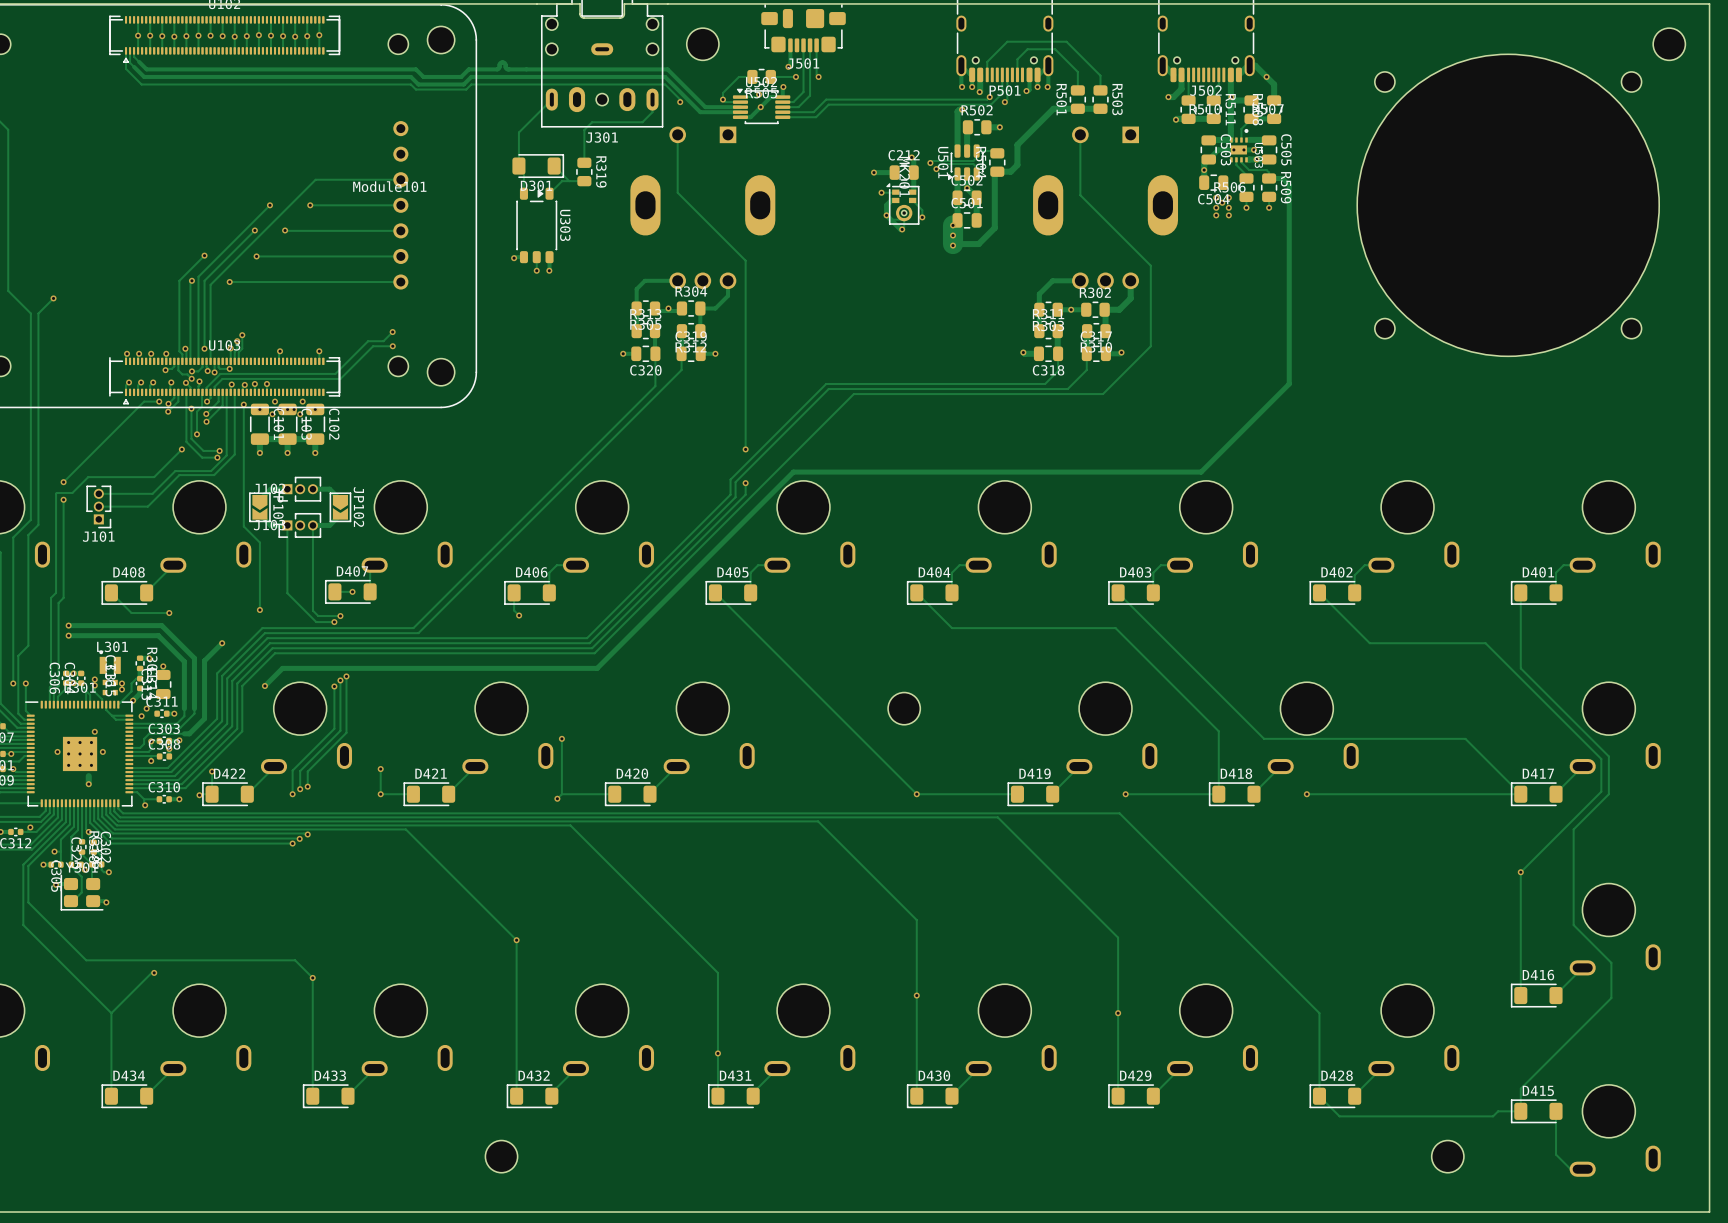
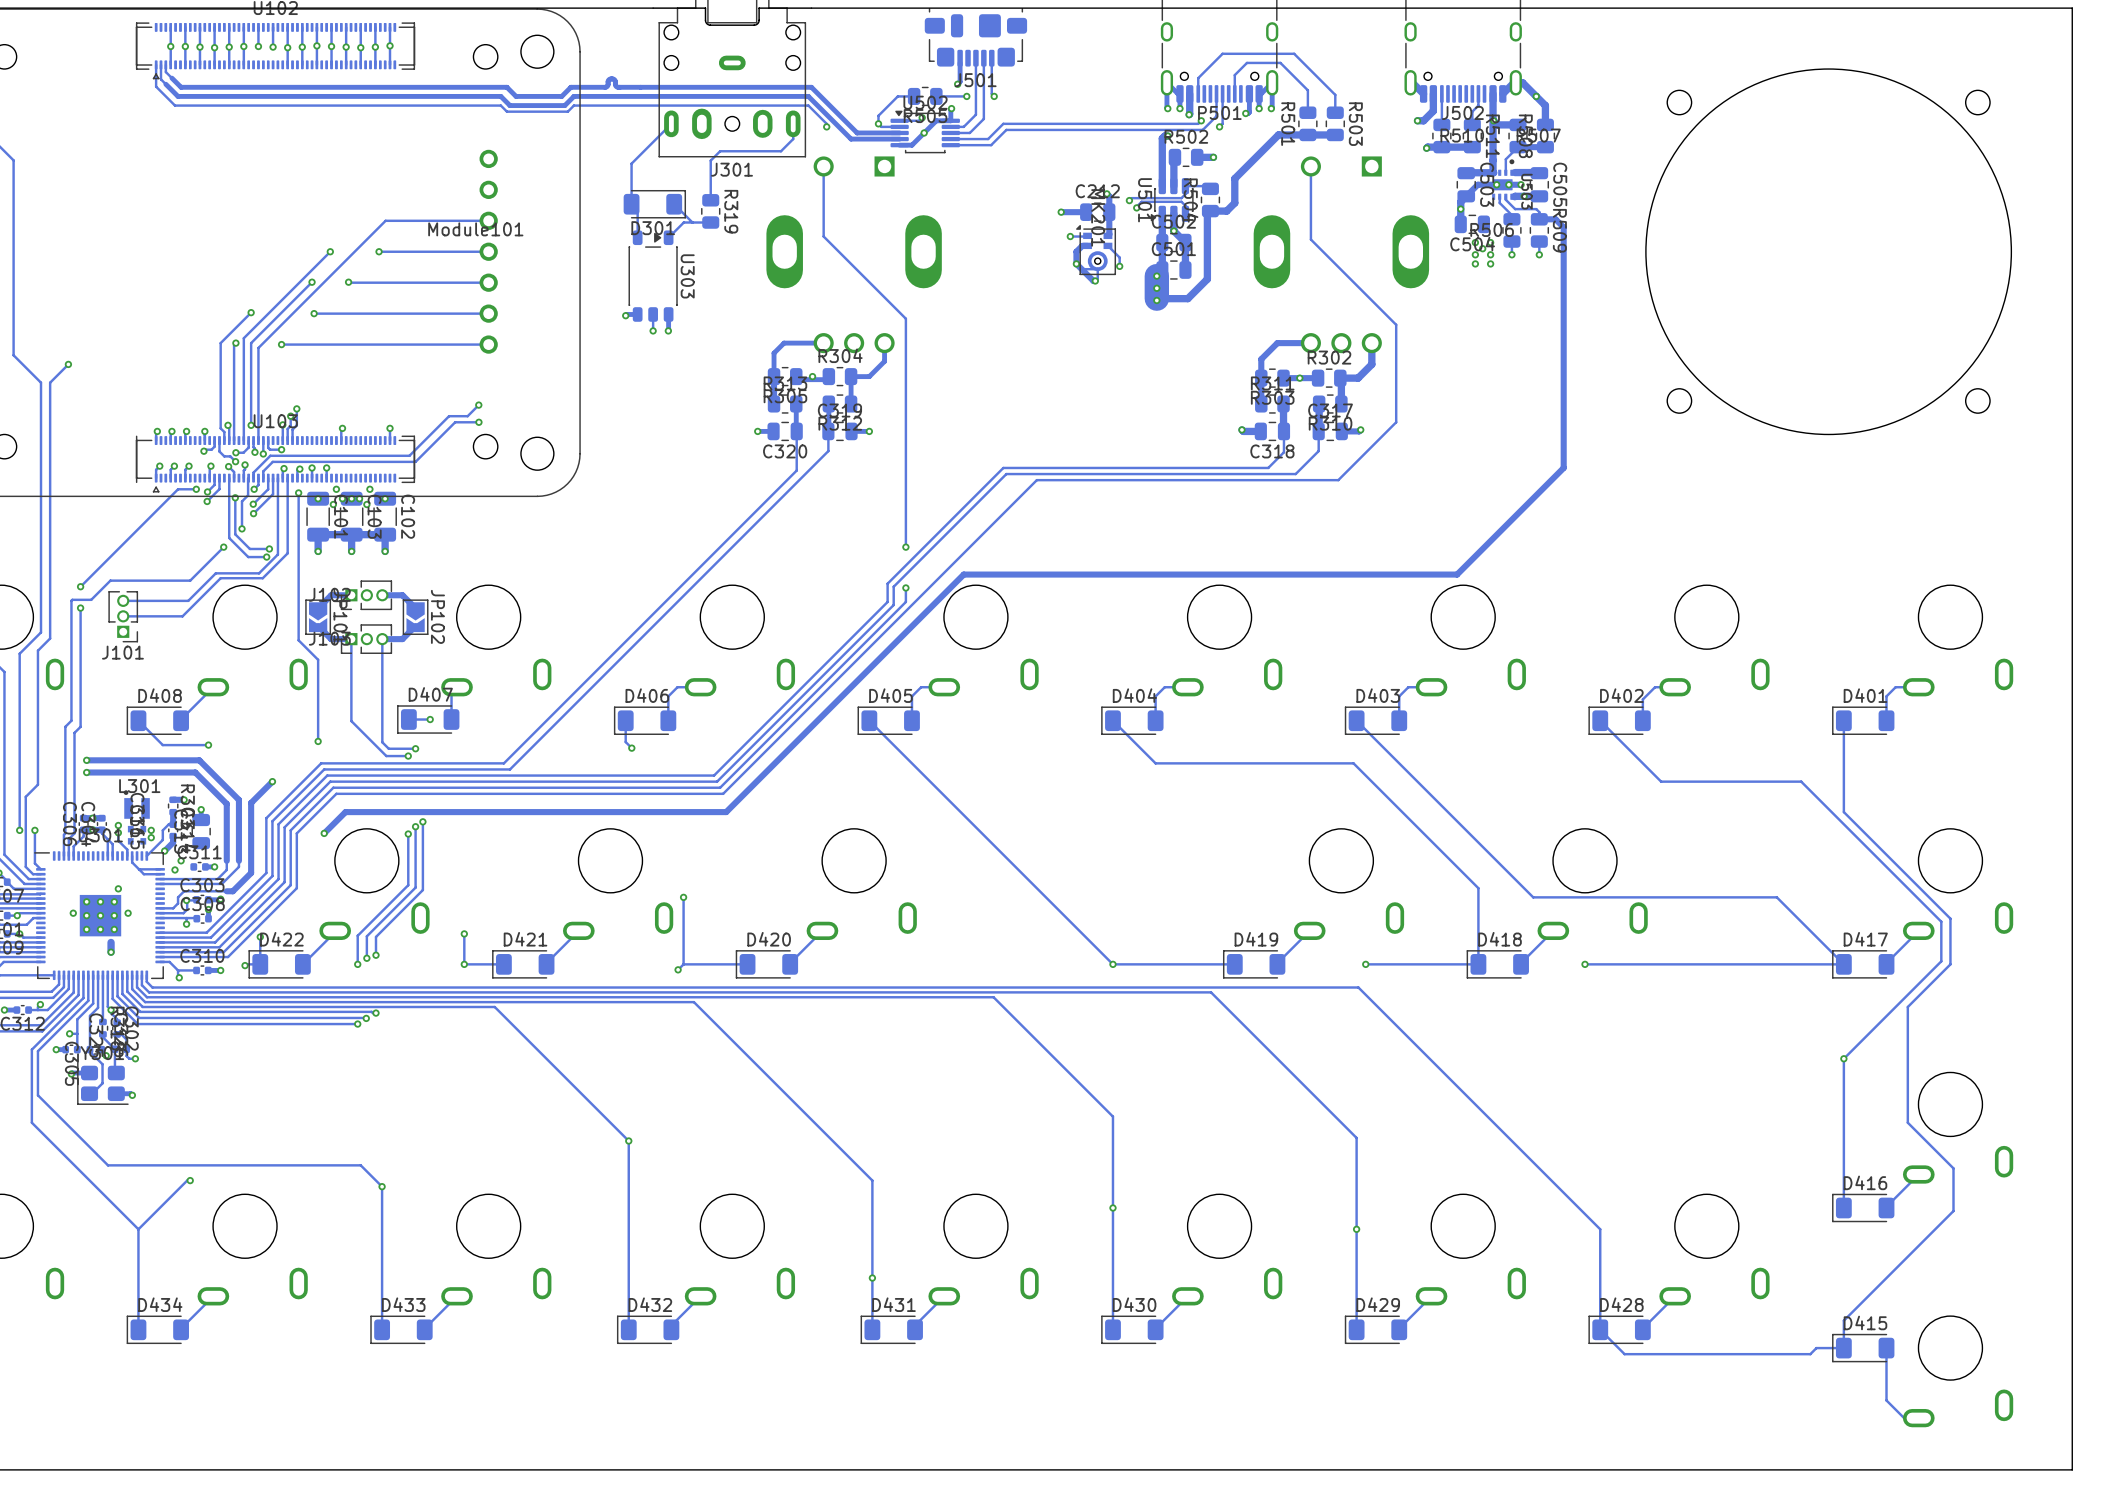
part: (702, 44) -> none
part: (1669, 44) -> none
part: (904, 708) -> none
part: (501, 1156) -> none
part: (1447, 1156) -> none

